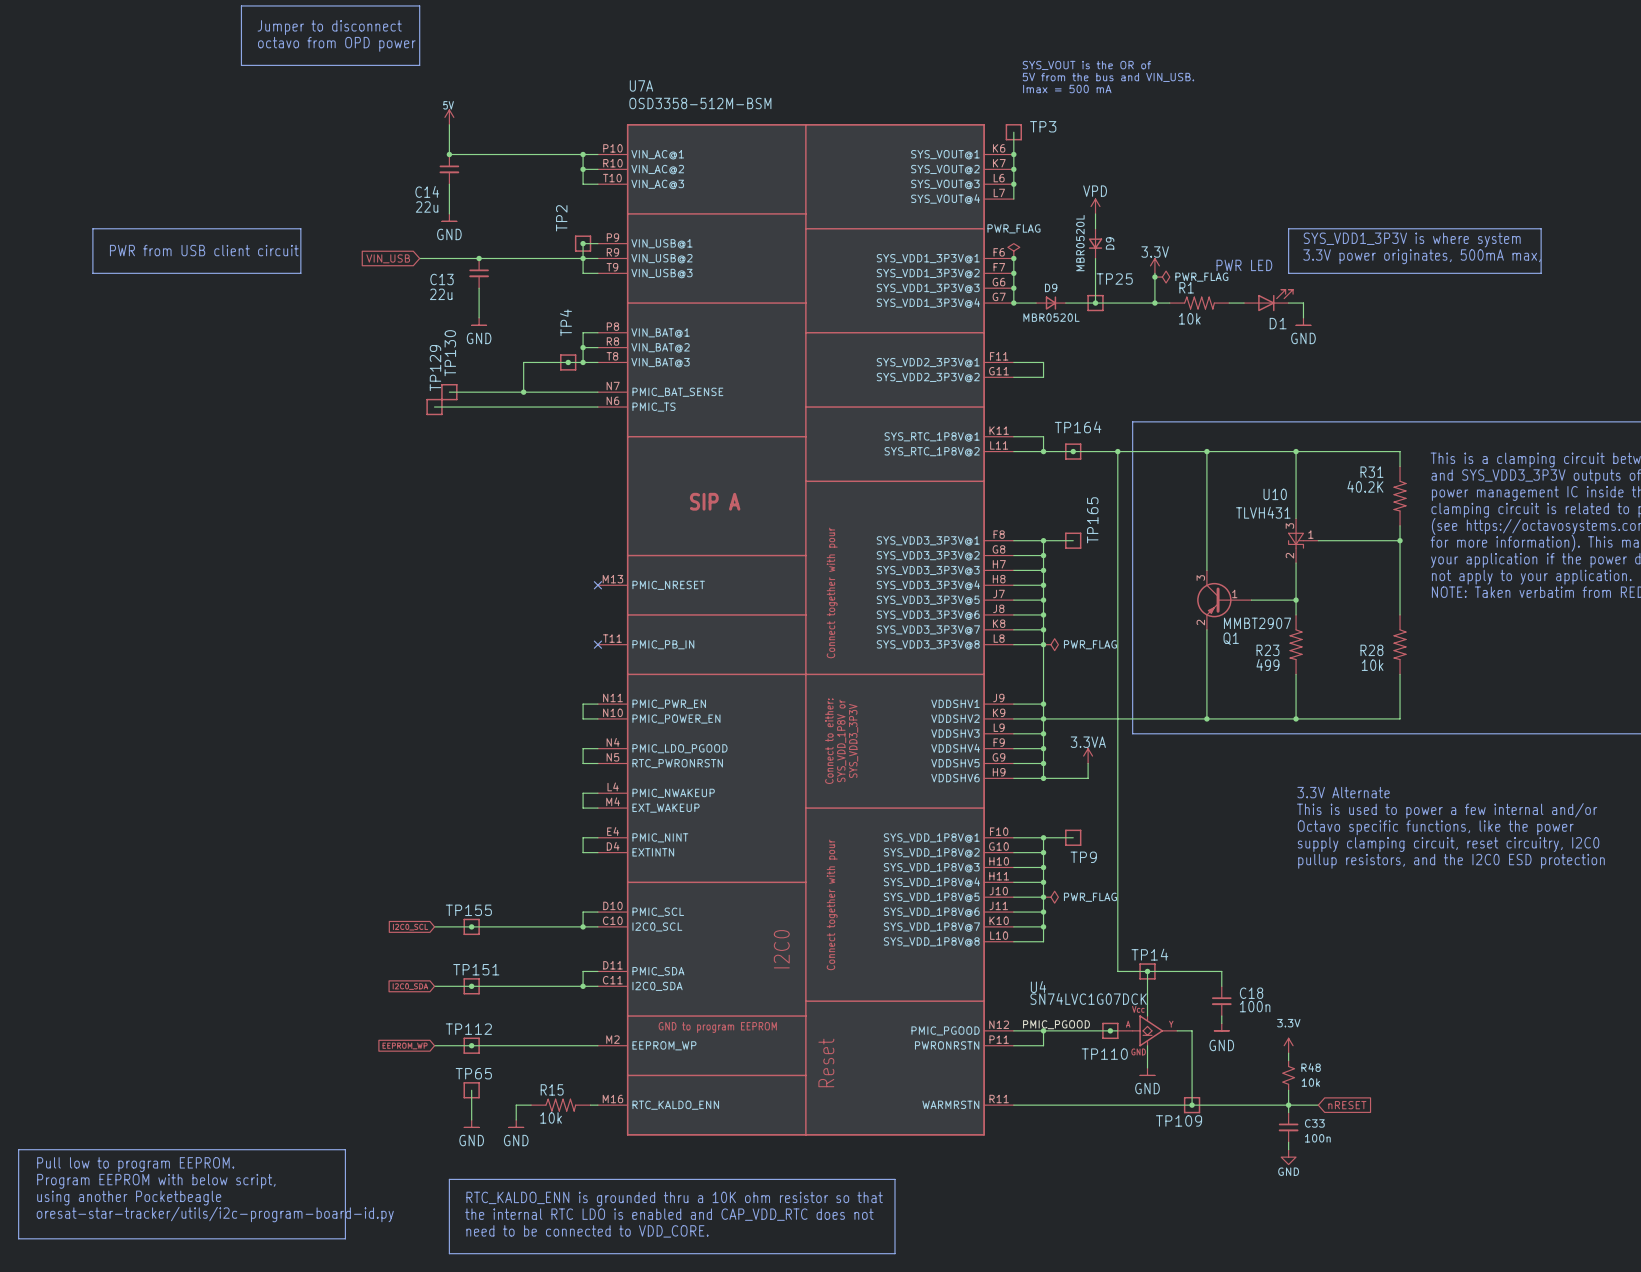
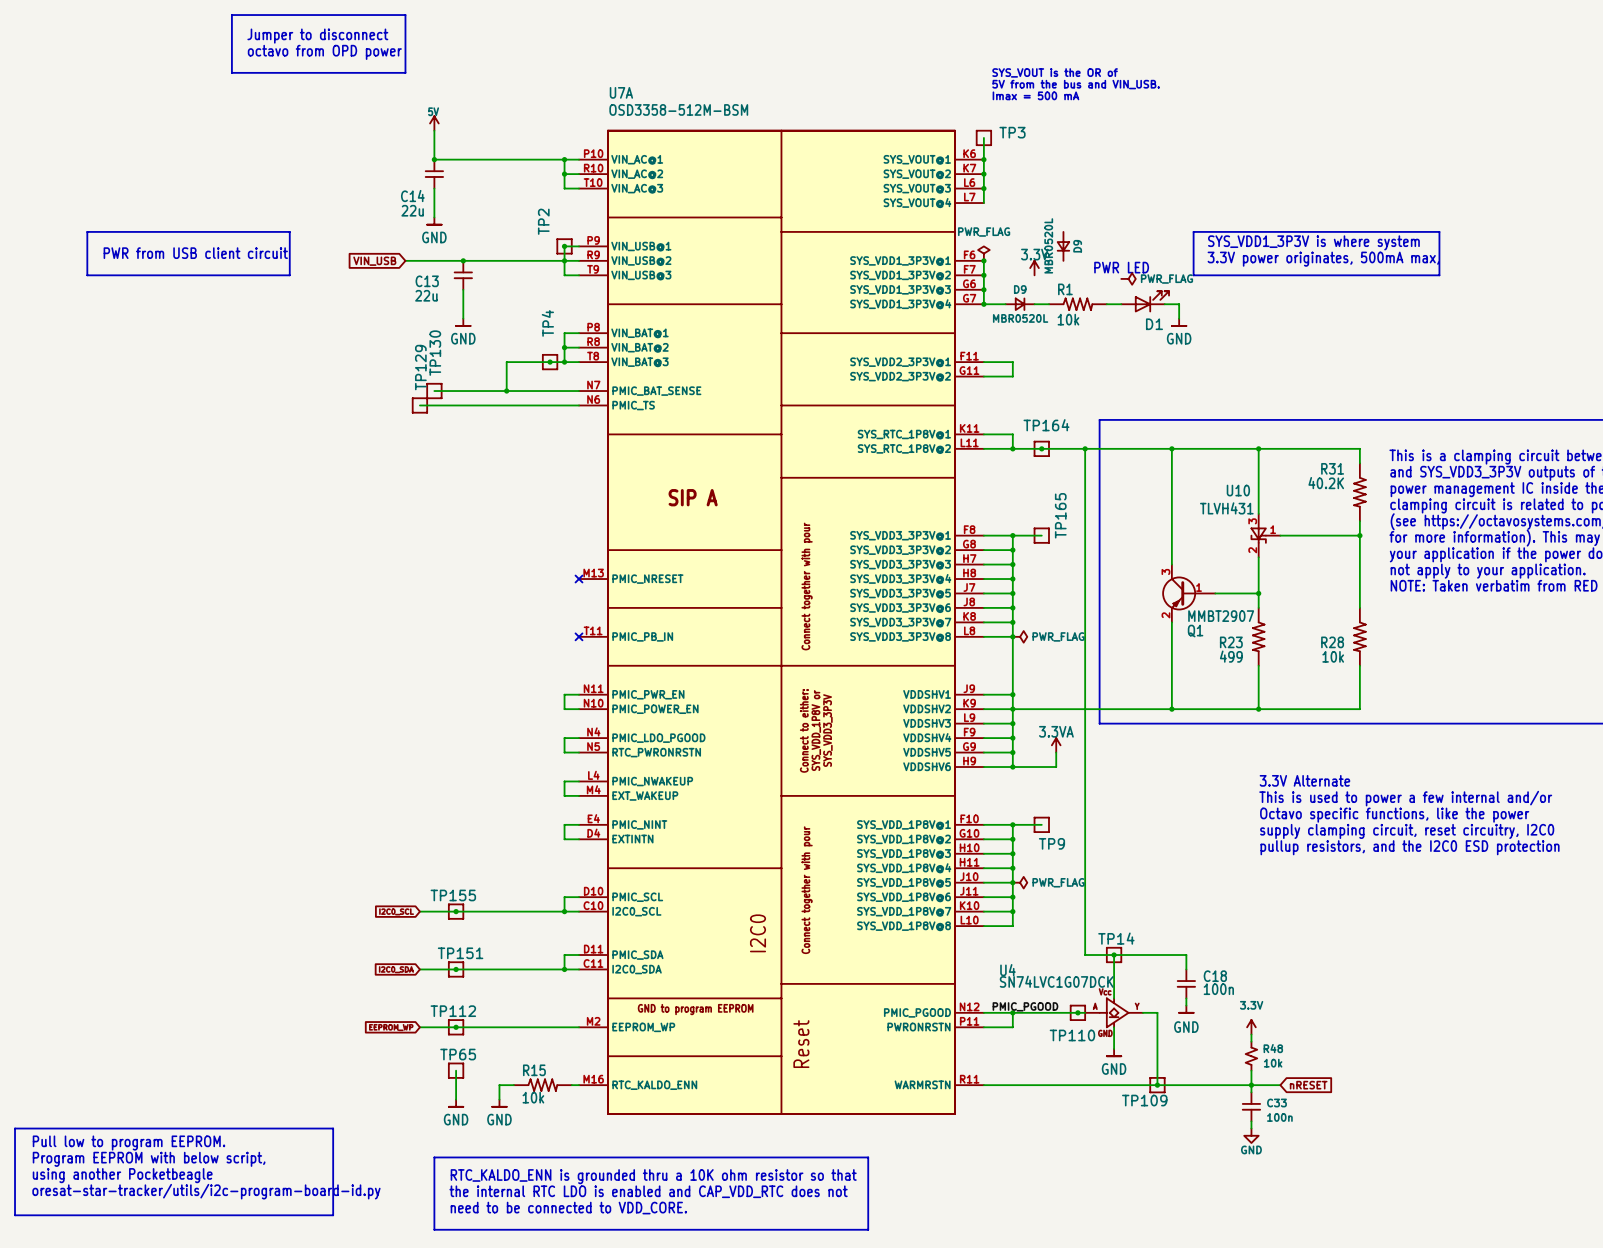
power symbol: VPD (1095, 206) -> none
wire: (1095, 213) (1095, 228) -> none
line: (1288, 228) (1288, 273) -> (1251, 231) (1193, 231) (1193, 275) (1251, 275)
line: (1481, 228) (1541, 228) (1541, 273) (1481, 273) -> (1439, 231) (1439, 275)
text position: SYS_VDD1_3P3V is where system (1412, 240) -> SYS_VDD1_3P3V is where system (1313, 242)
text position: 3.3V power originates, 500mA max, (1422, 256) -> 3.3V power originates, 500mA max, (1323, 259)
wire: (1095, 258) (1095, 303) -> none
power symbol position: 3.3V (1154, 265) -> 3.3V (1034, 268)
text position: PWR LED (1244, 265) -> PWR LED (1121, 267)
wire: (1154, 273) (1154, 303) (1169, 303) -> none
junction: (1154, 277) -> none
D1 position: (1268, 300) -> (1145, 301)
junction: (1095, 303) -> none
TP25: (1095, 303) -> none
junction: (1154, 303) -> none
R1 position: (1199, 303) -> (1077, 304)
wire: (1229, 303) (1244, 303) -> none
wire: (1288, 303) (1303, 303) (1303, 317) -> (1164, 304) (1179, 304) (1179, 318)
power symbol position: GND (1303, 321) -> GND (1179, 322)

